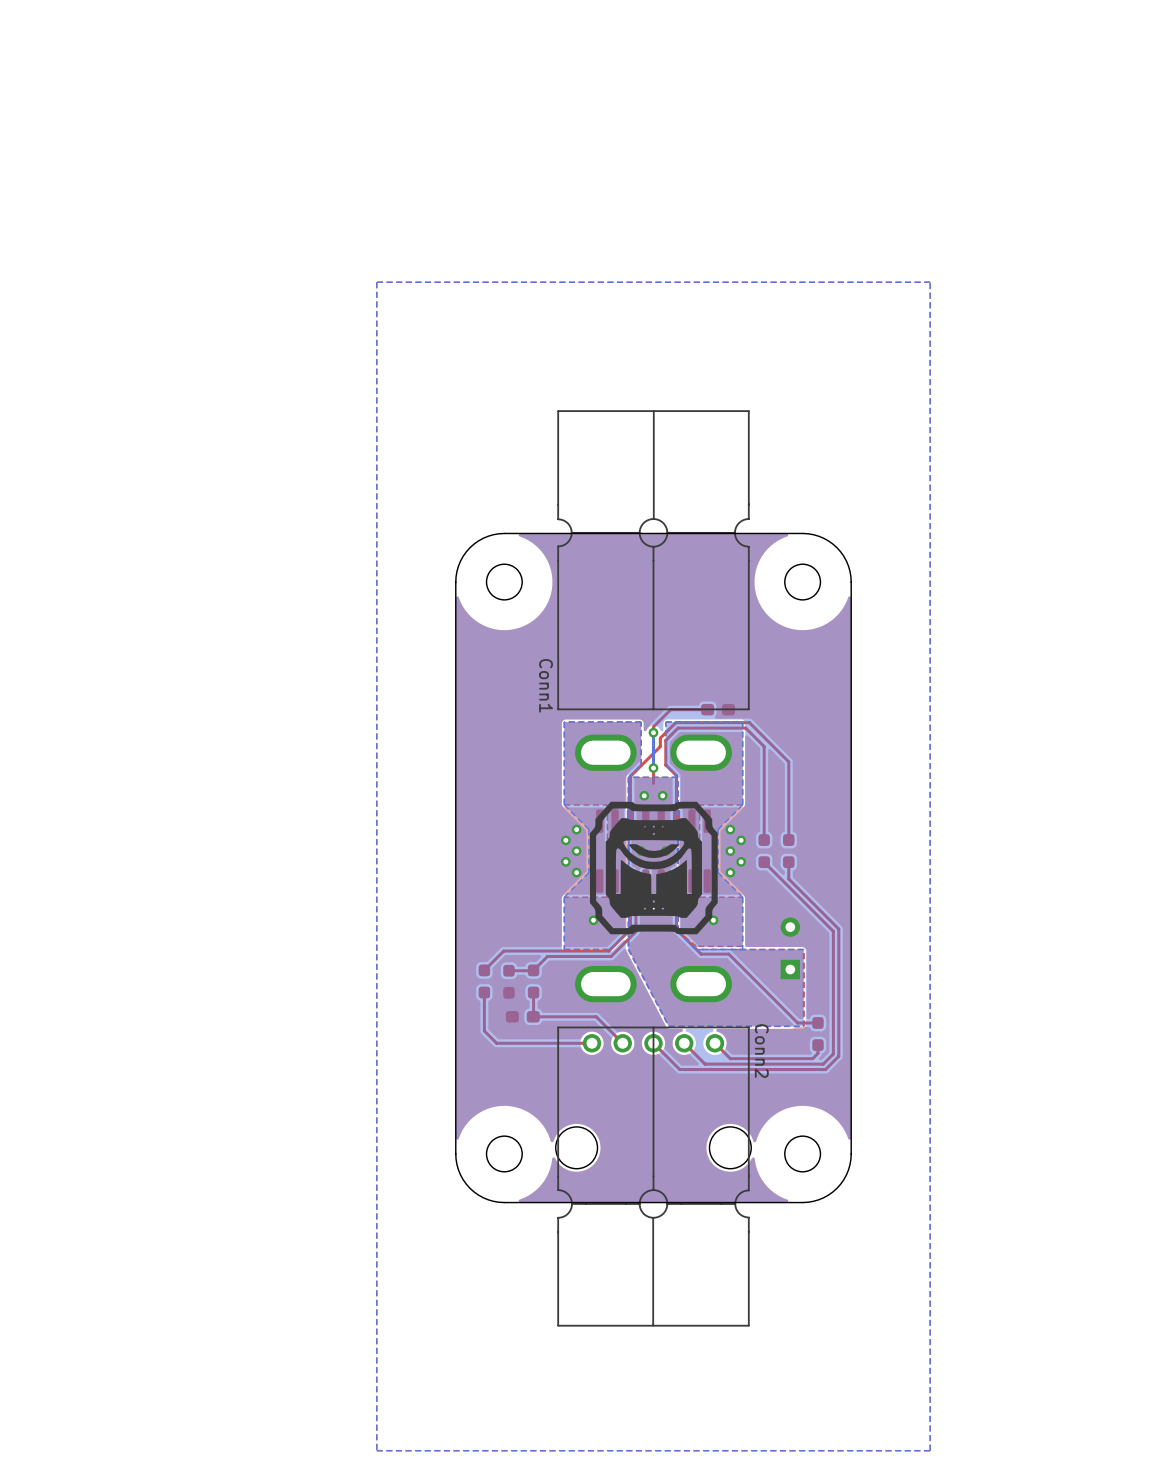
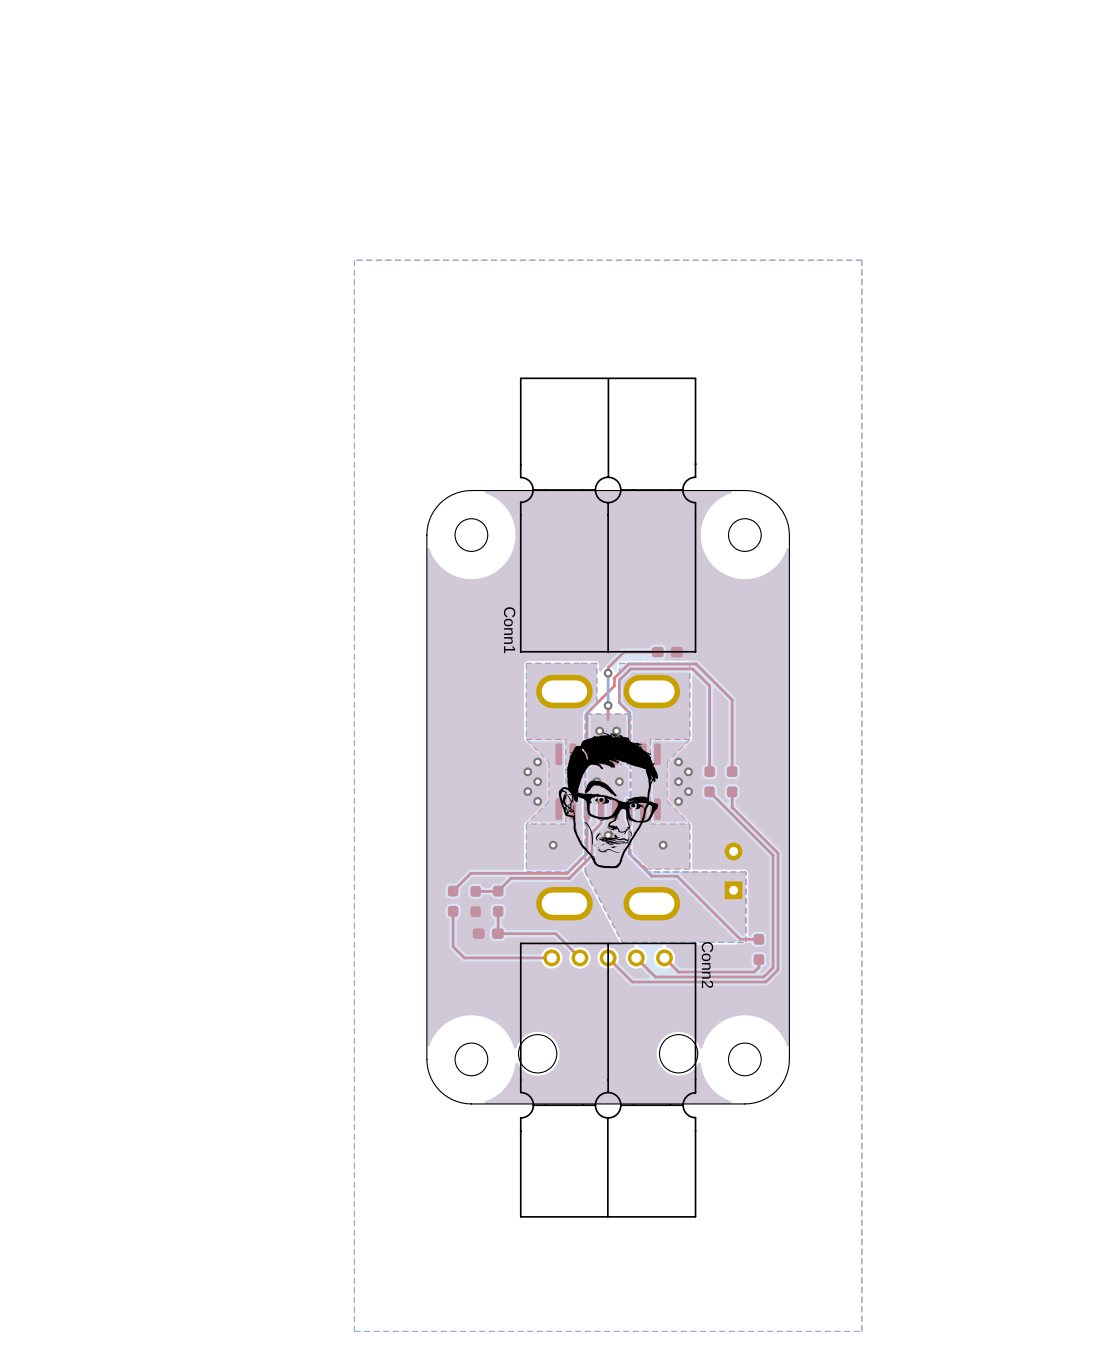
drawing shape: [589, 801, 718, 935] -> [558, 730, 664, 869]

